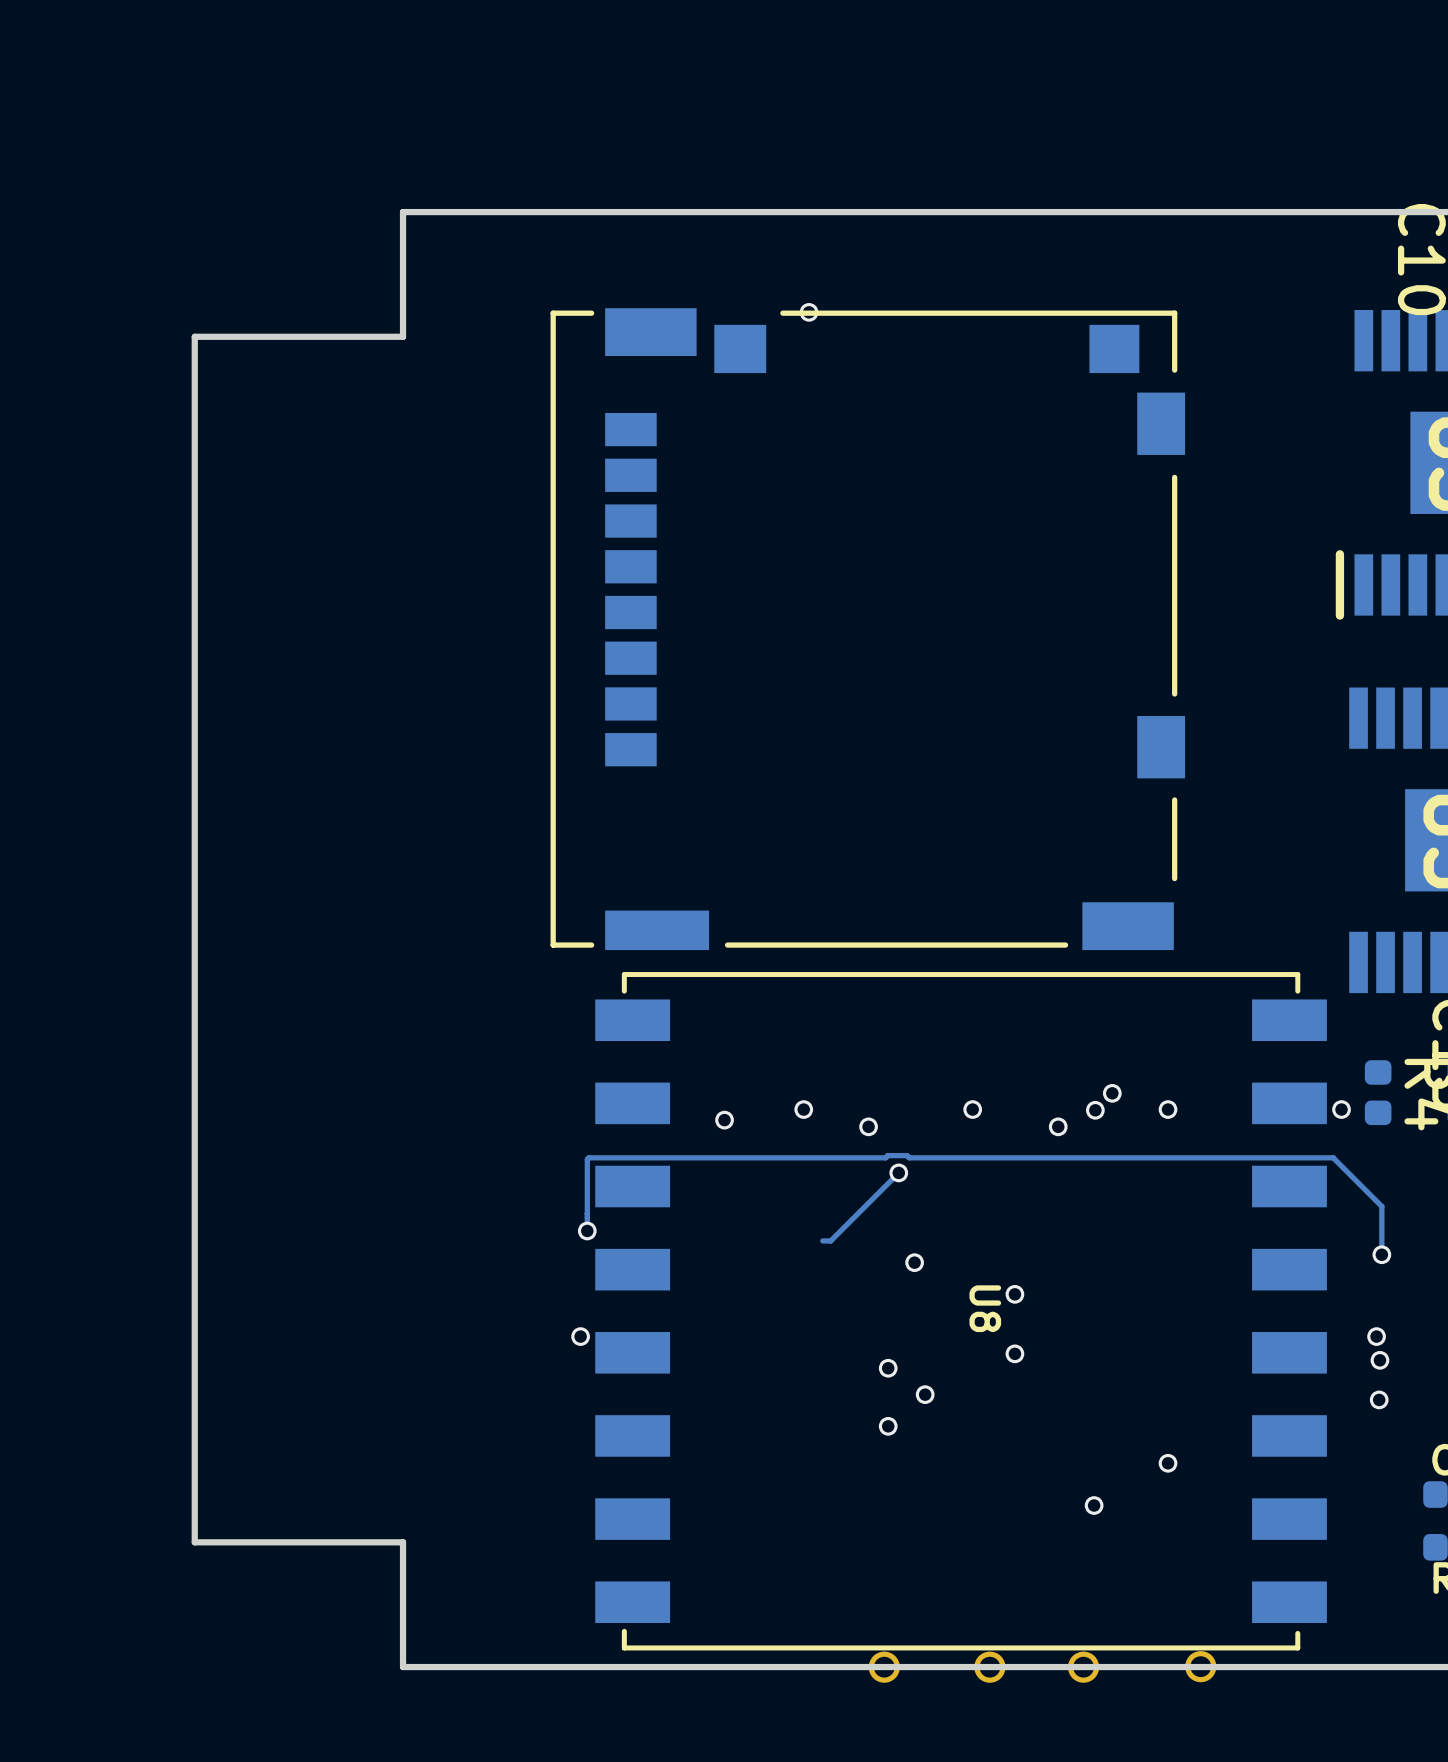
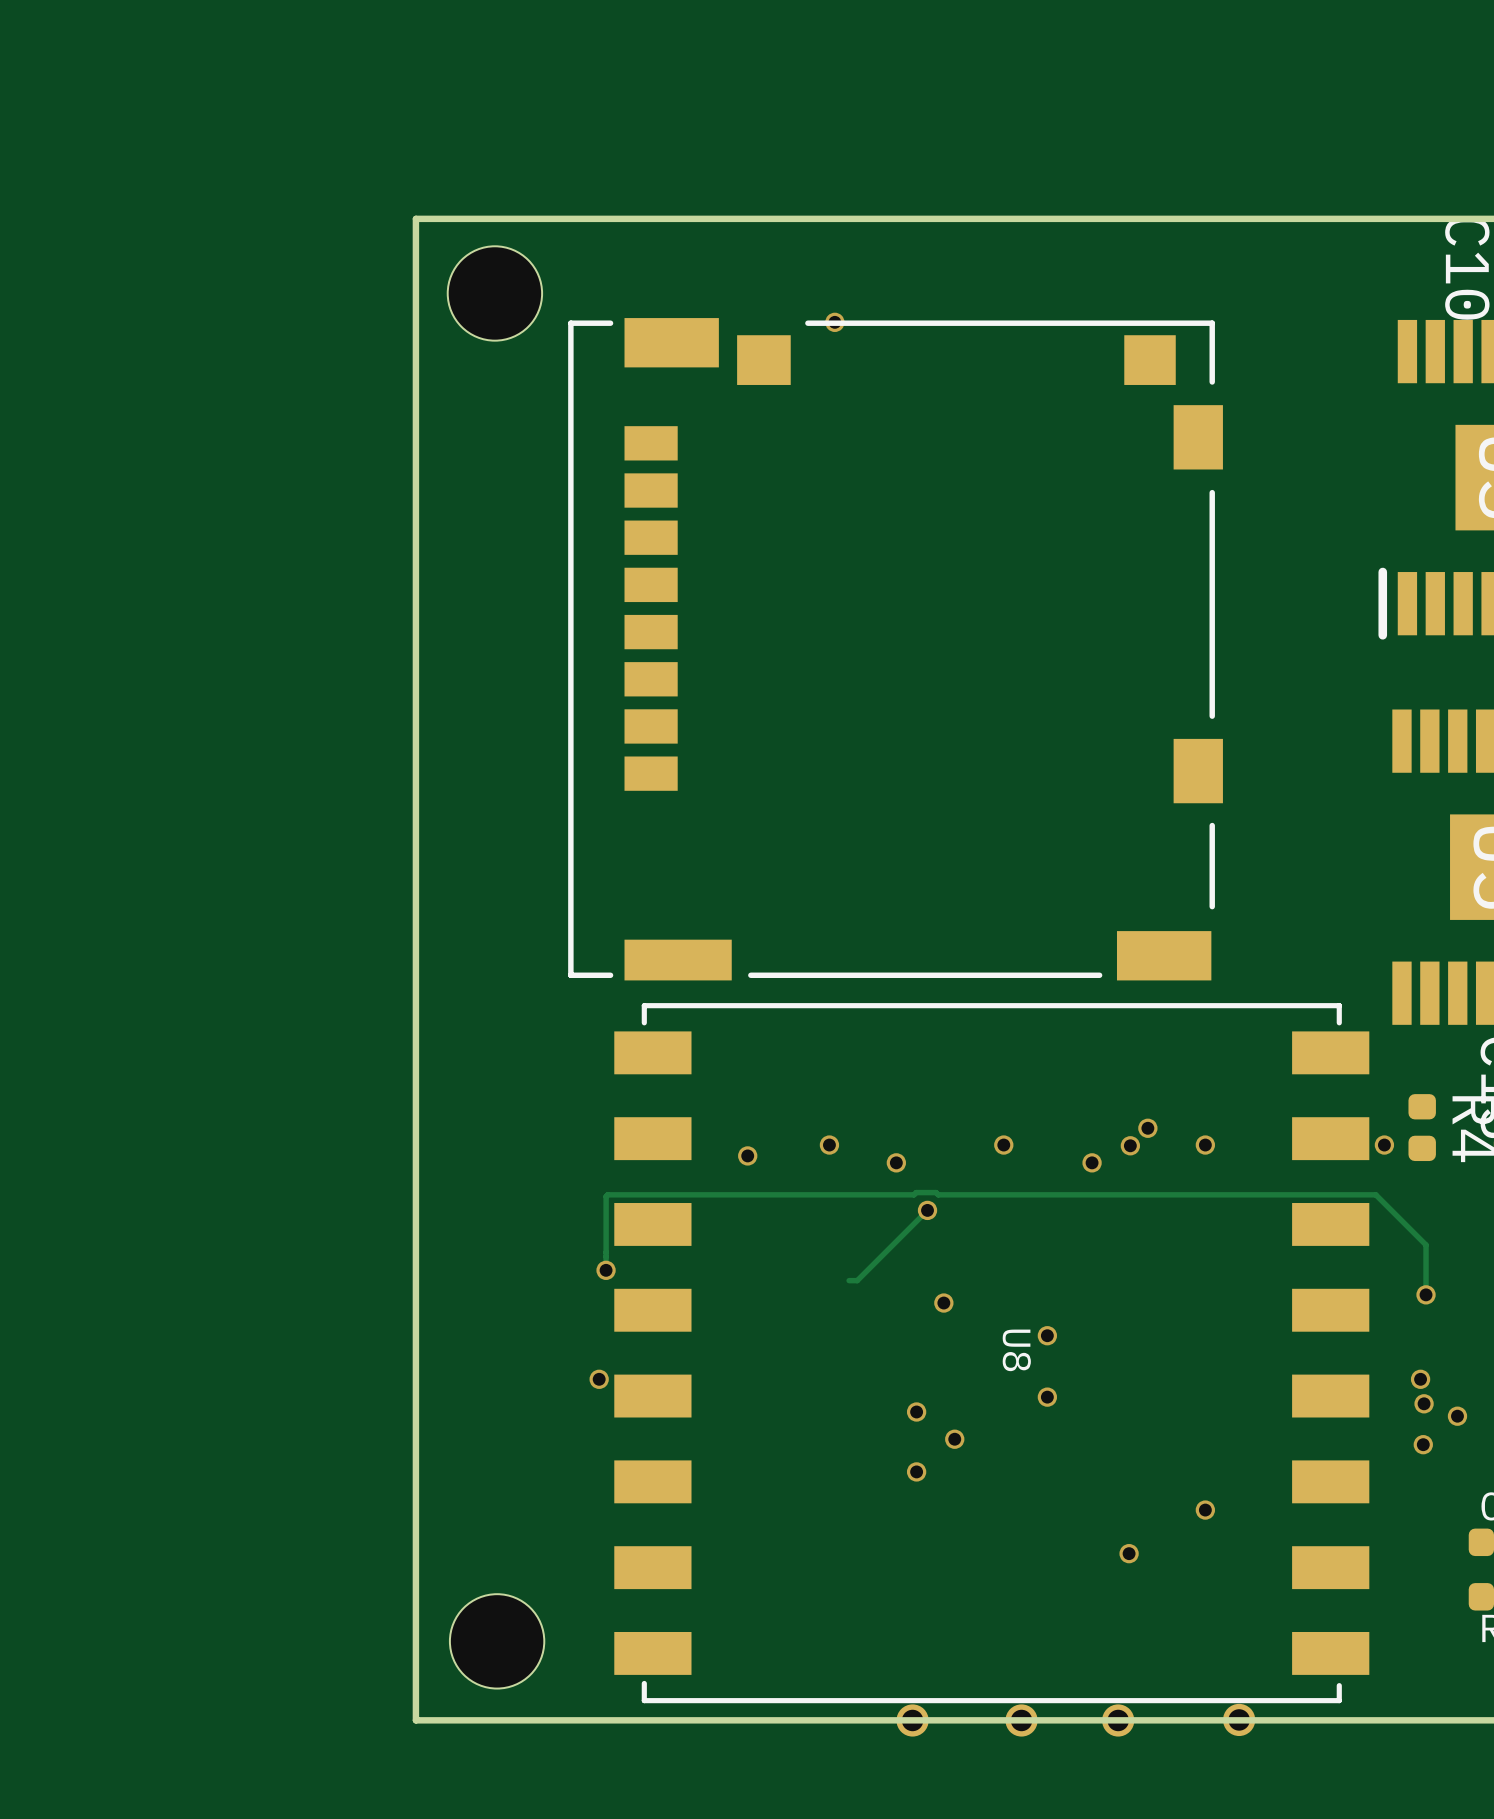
part: none -> (494, 293)
board edge: (403, 336) (194, 336) (194, 1542) (403, 1542) -> (415, 347) (415, 1591)
via: none -> (1457, 1416)
part: none -> (497, 1641)

